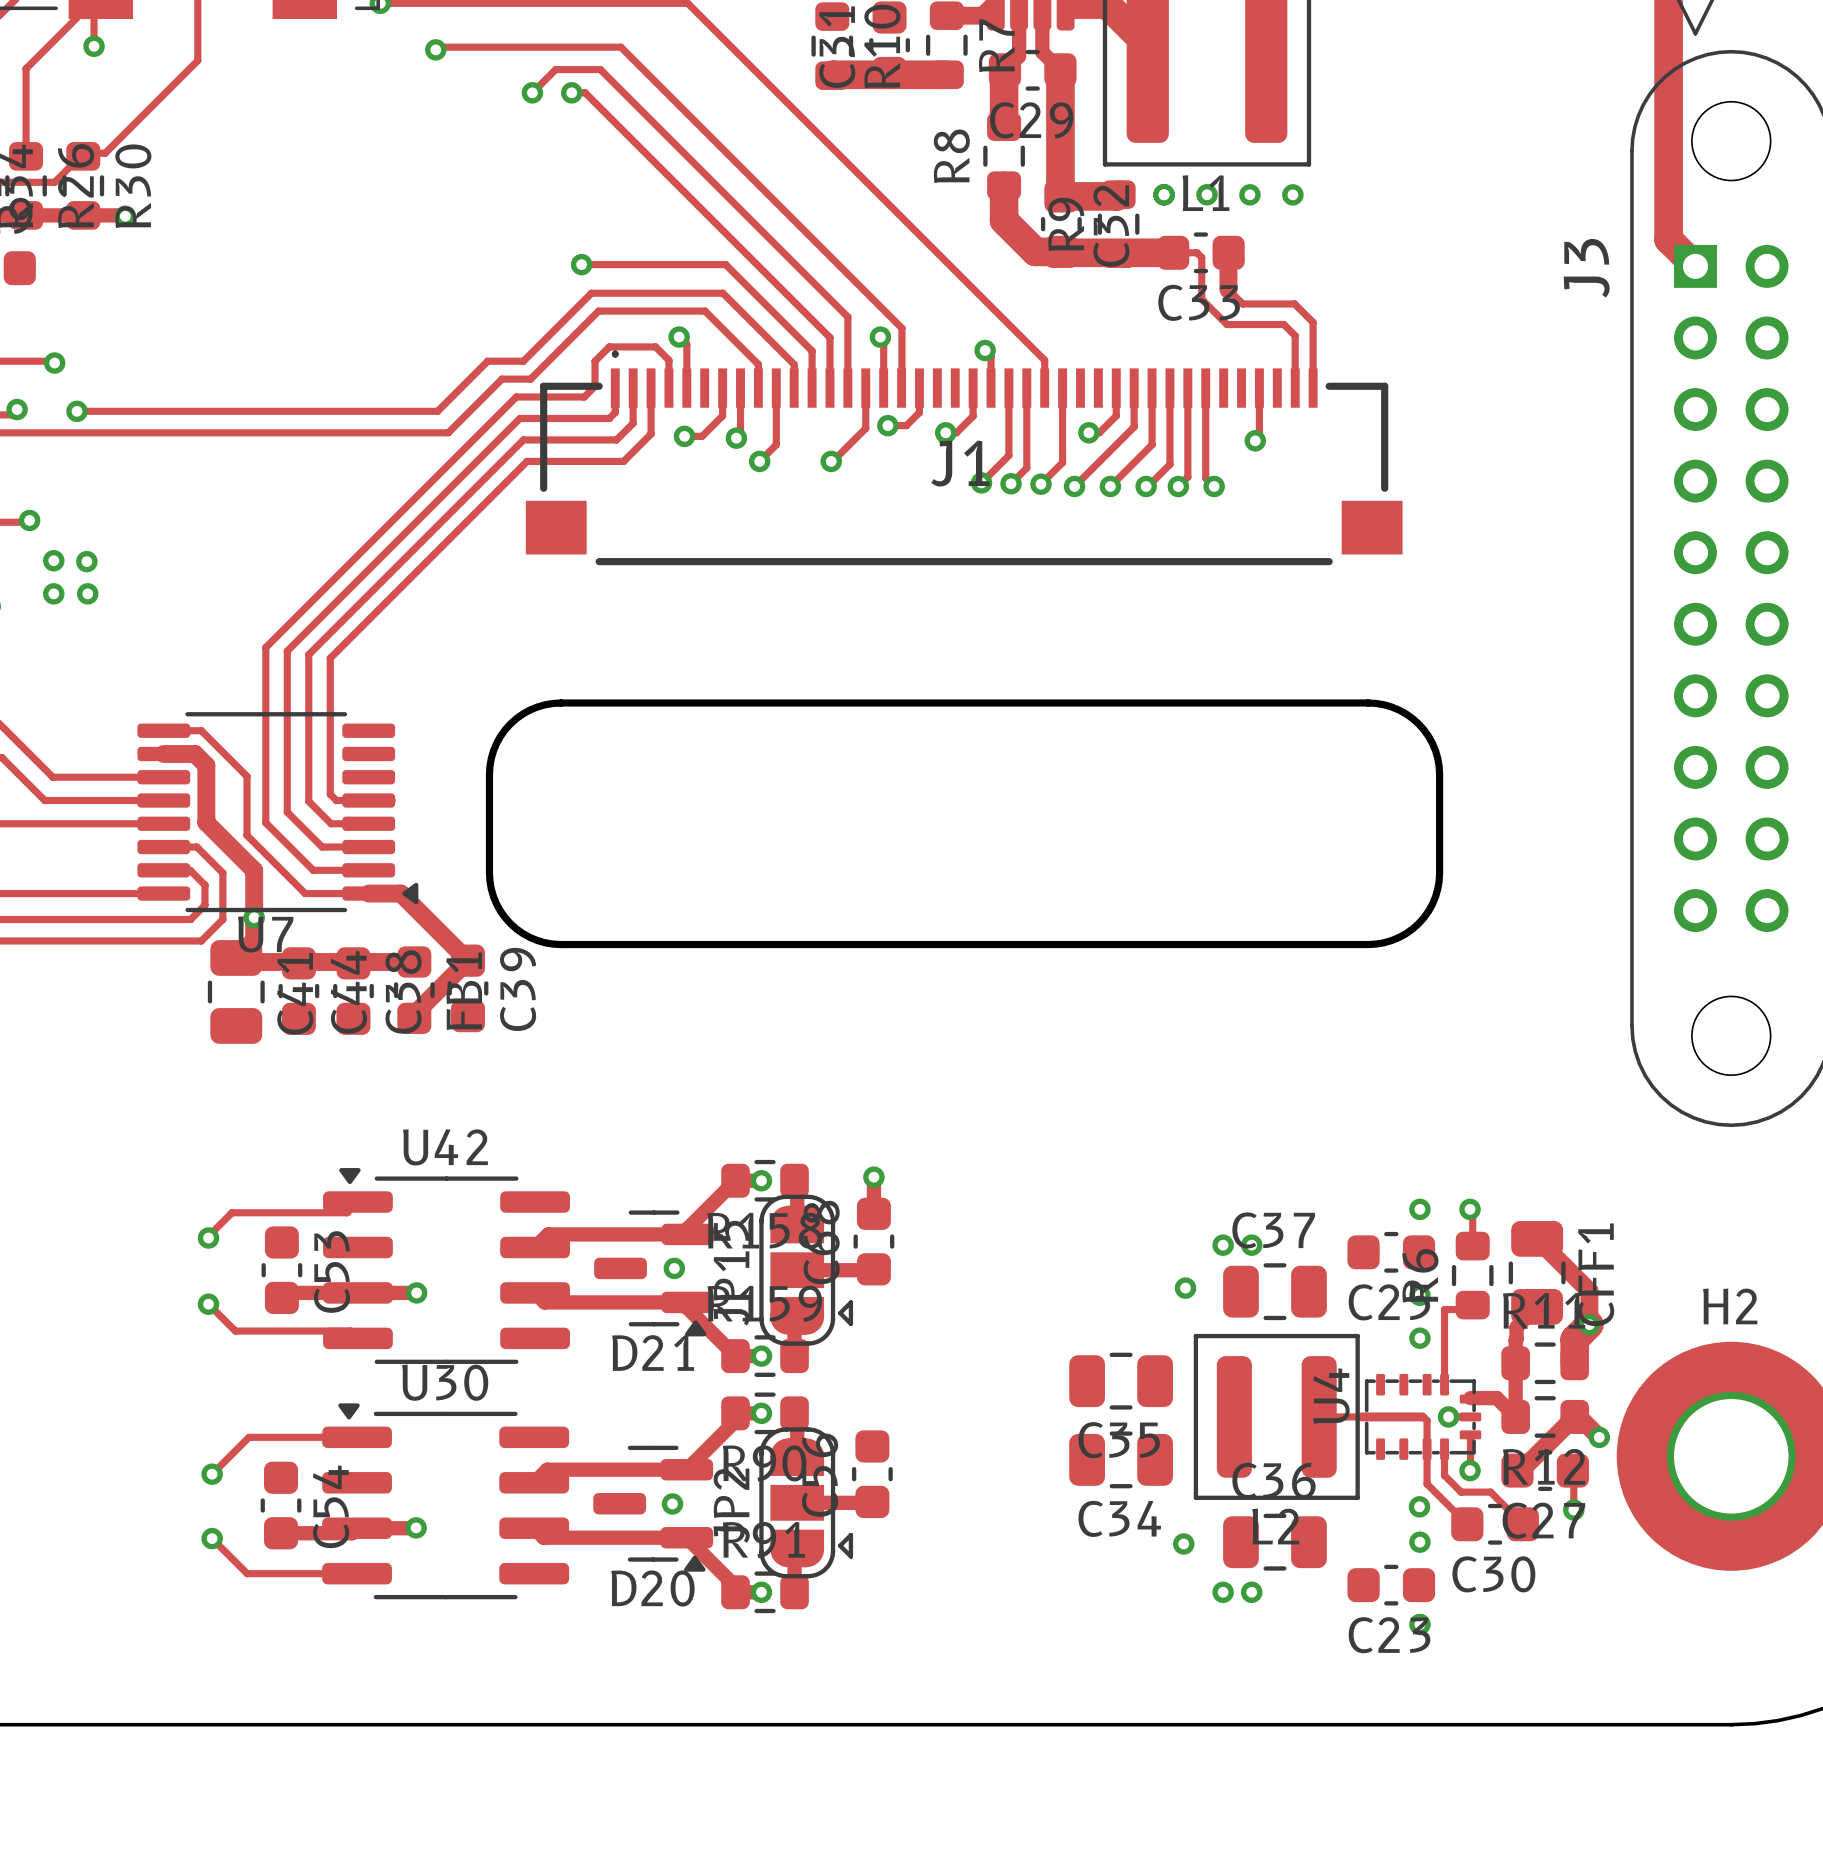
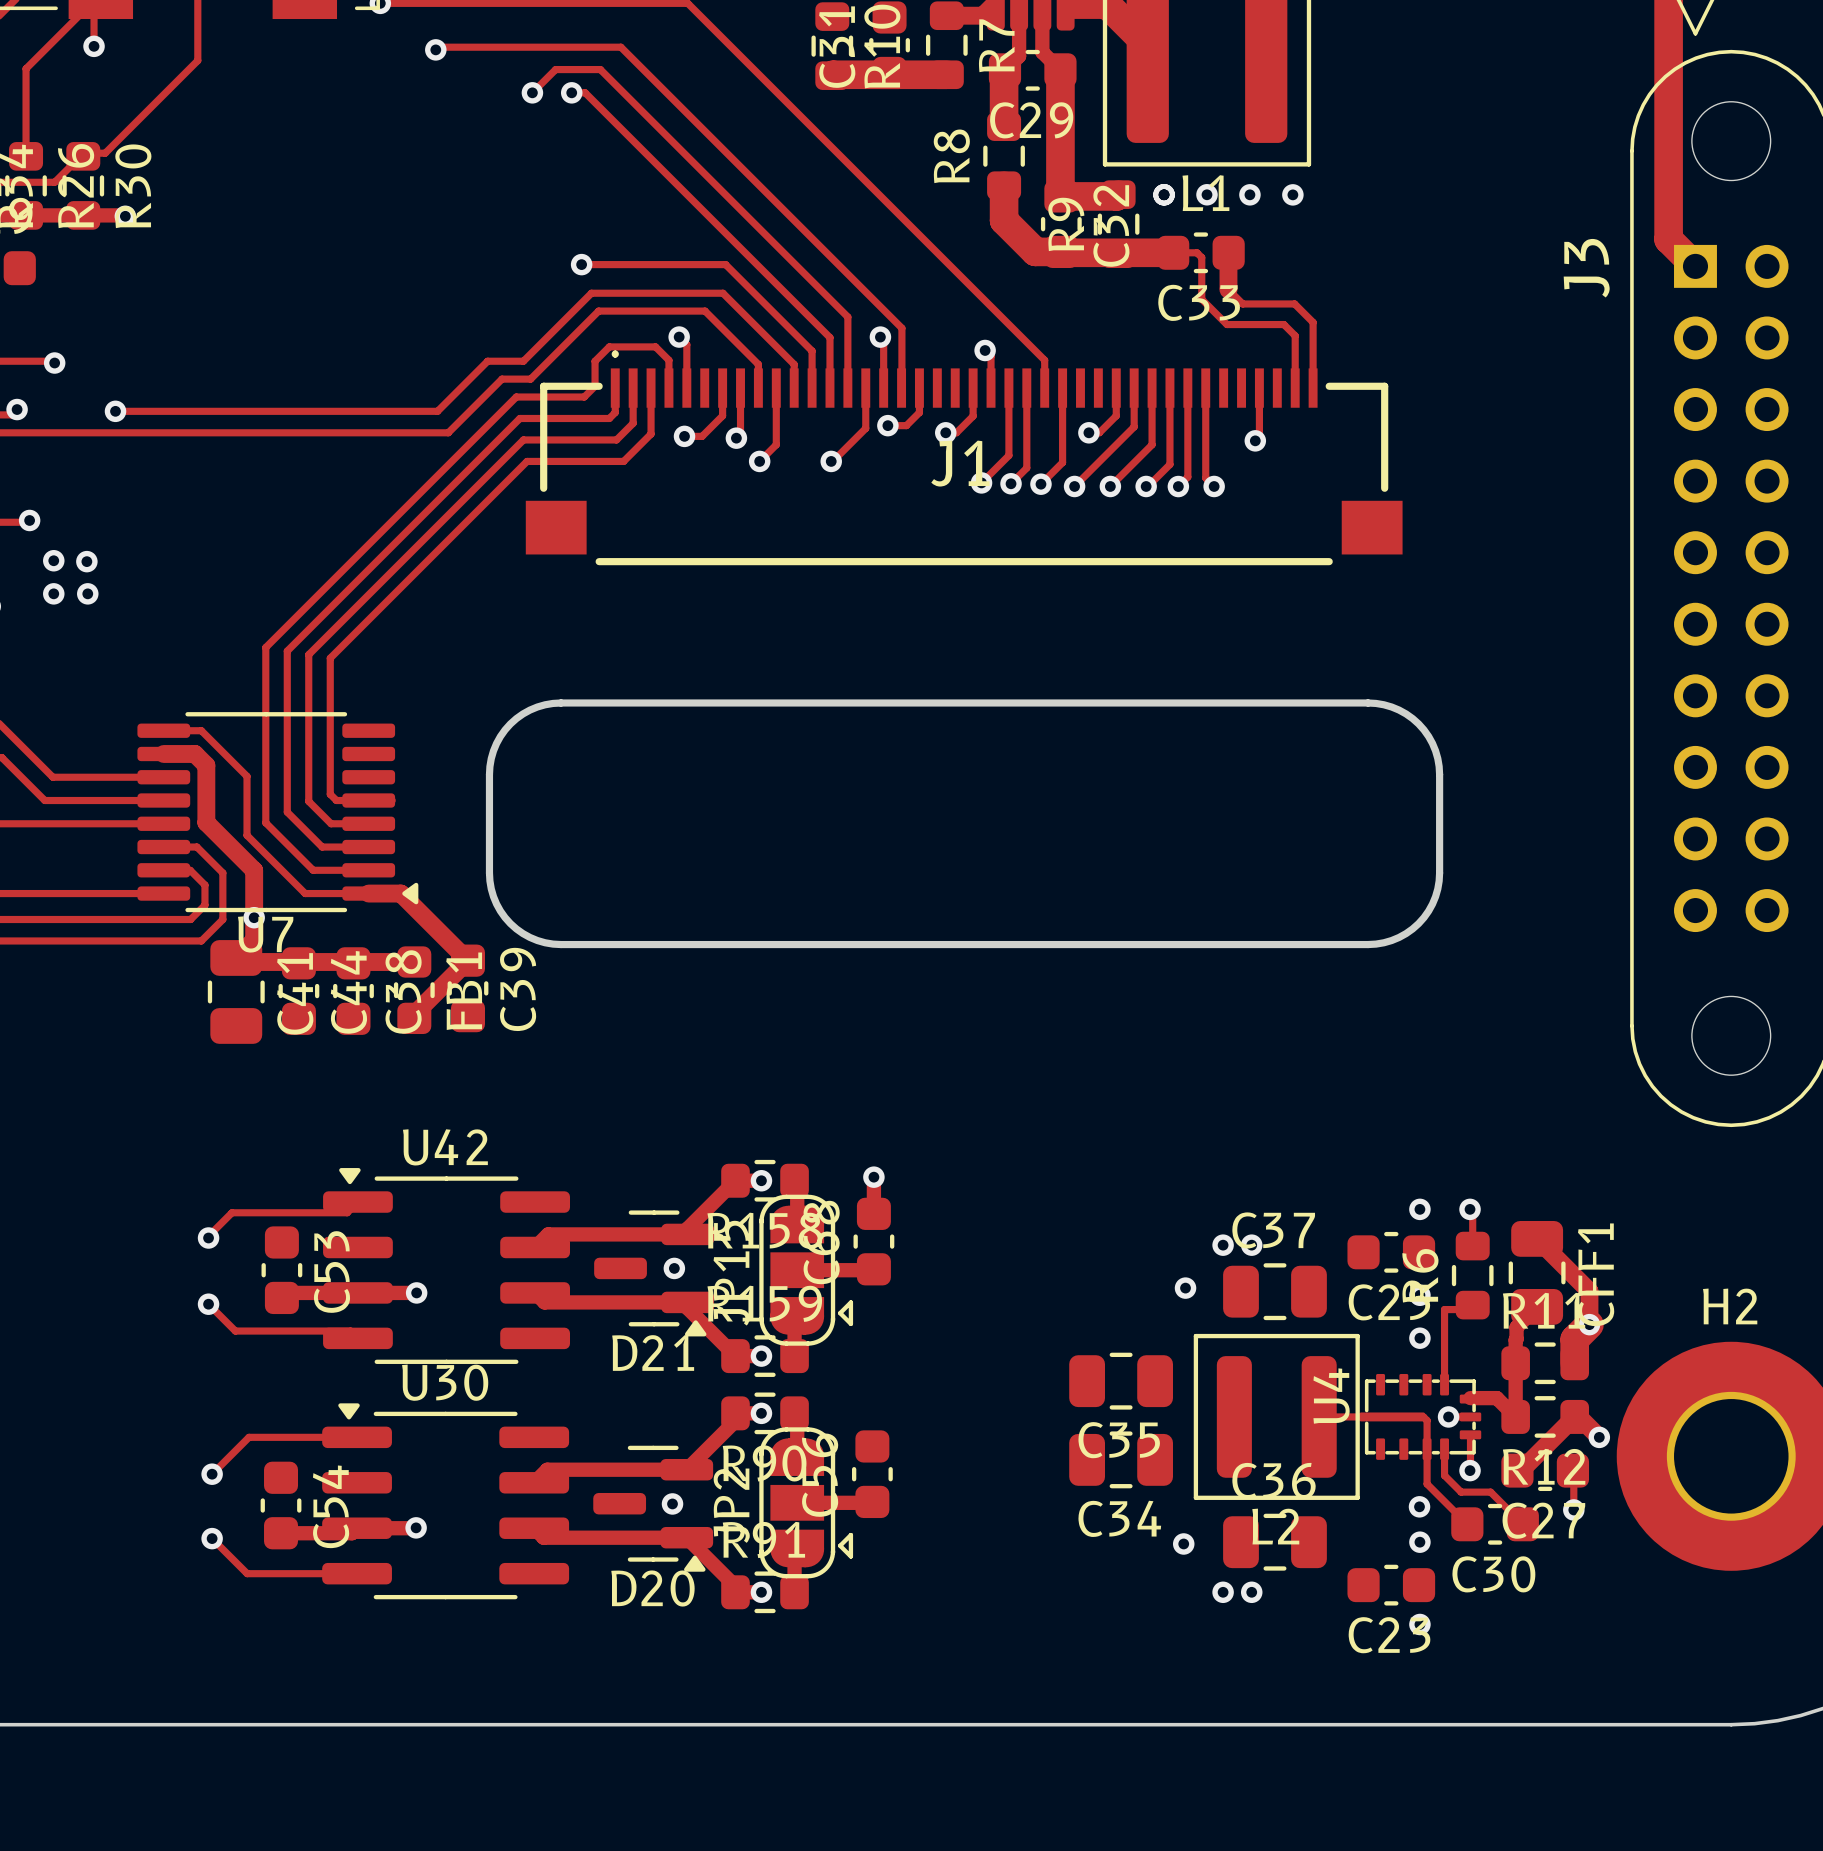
track: (77, 411) (115, 411) -> none
via position: (77, 411) -> (115, 411)

